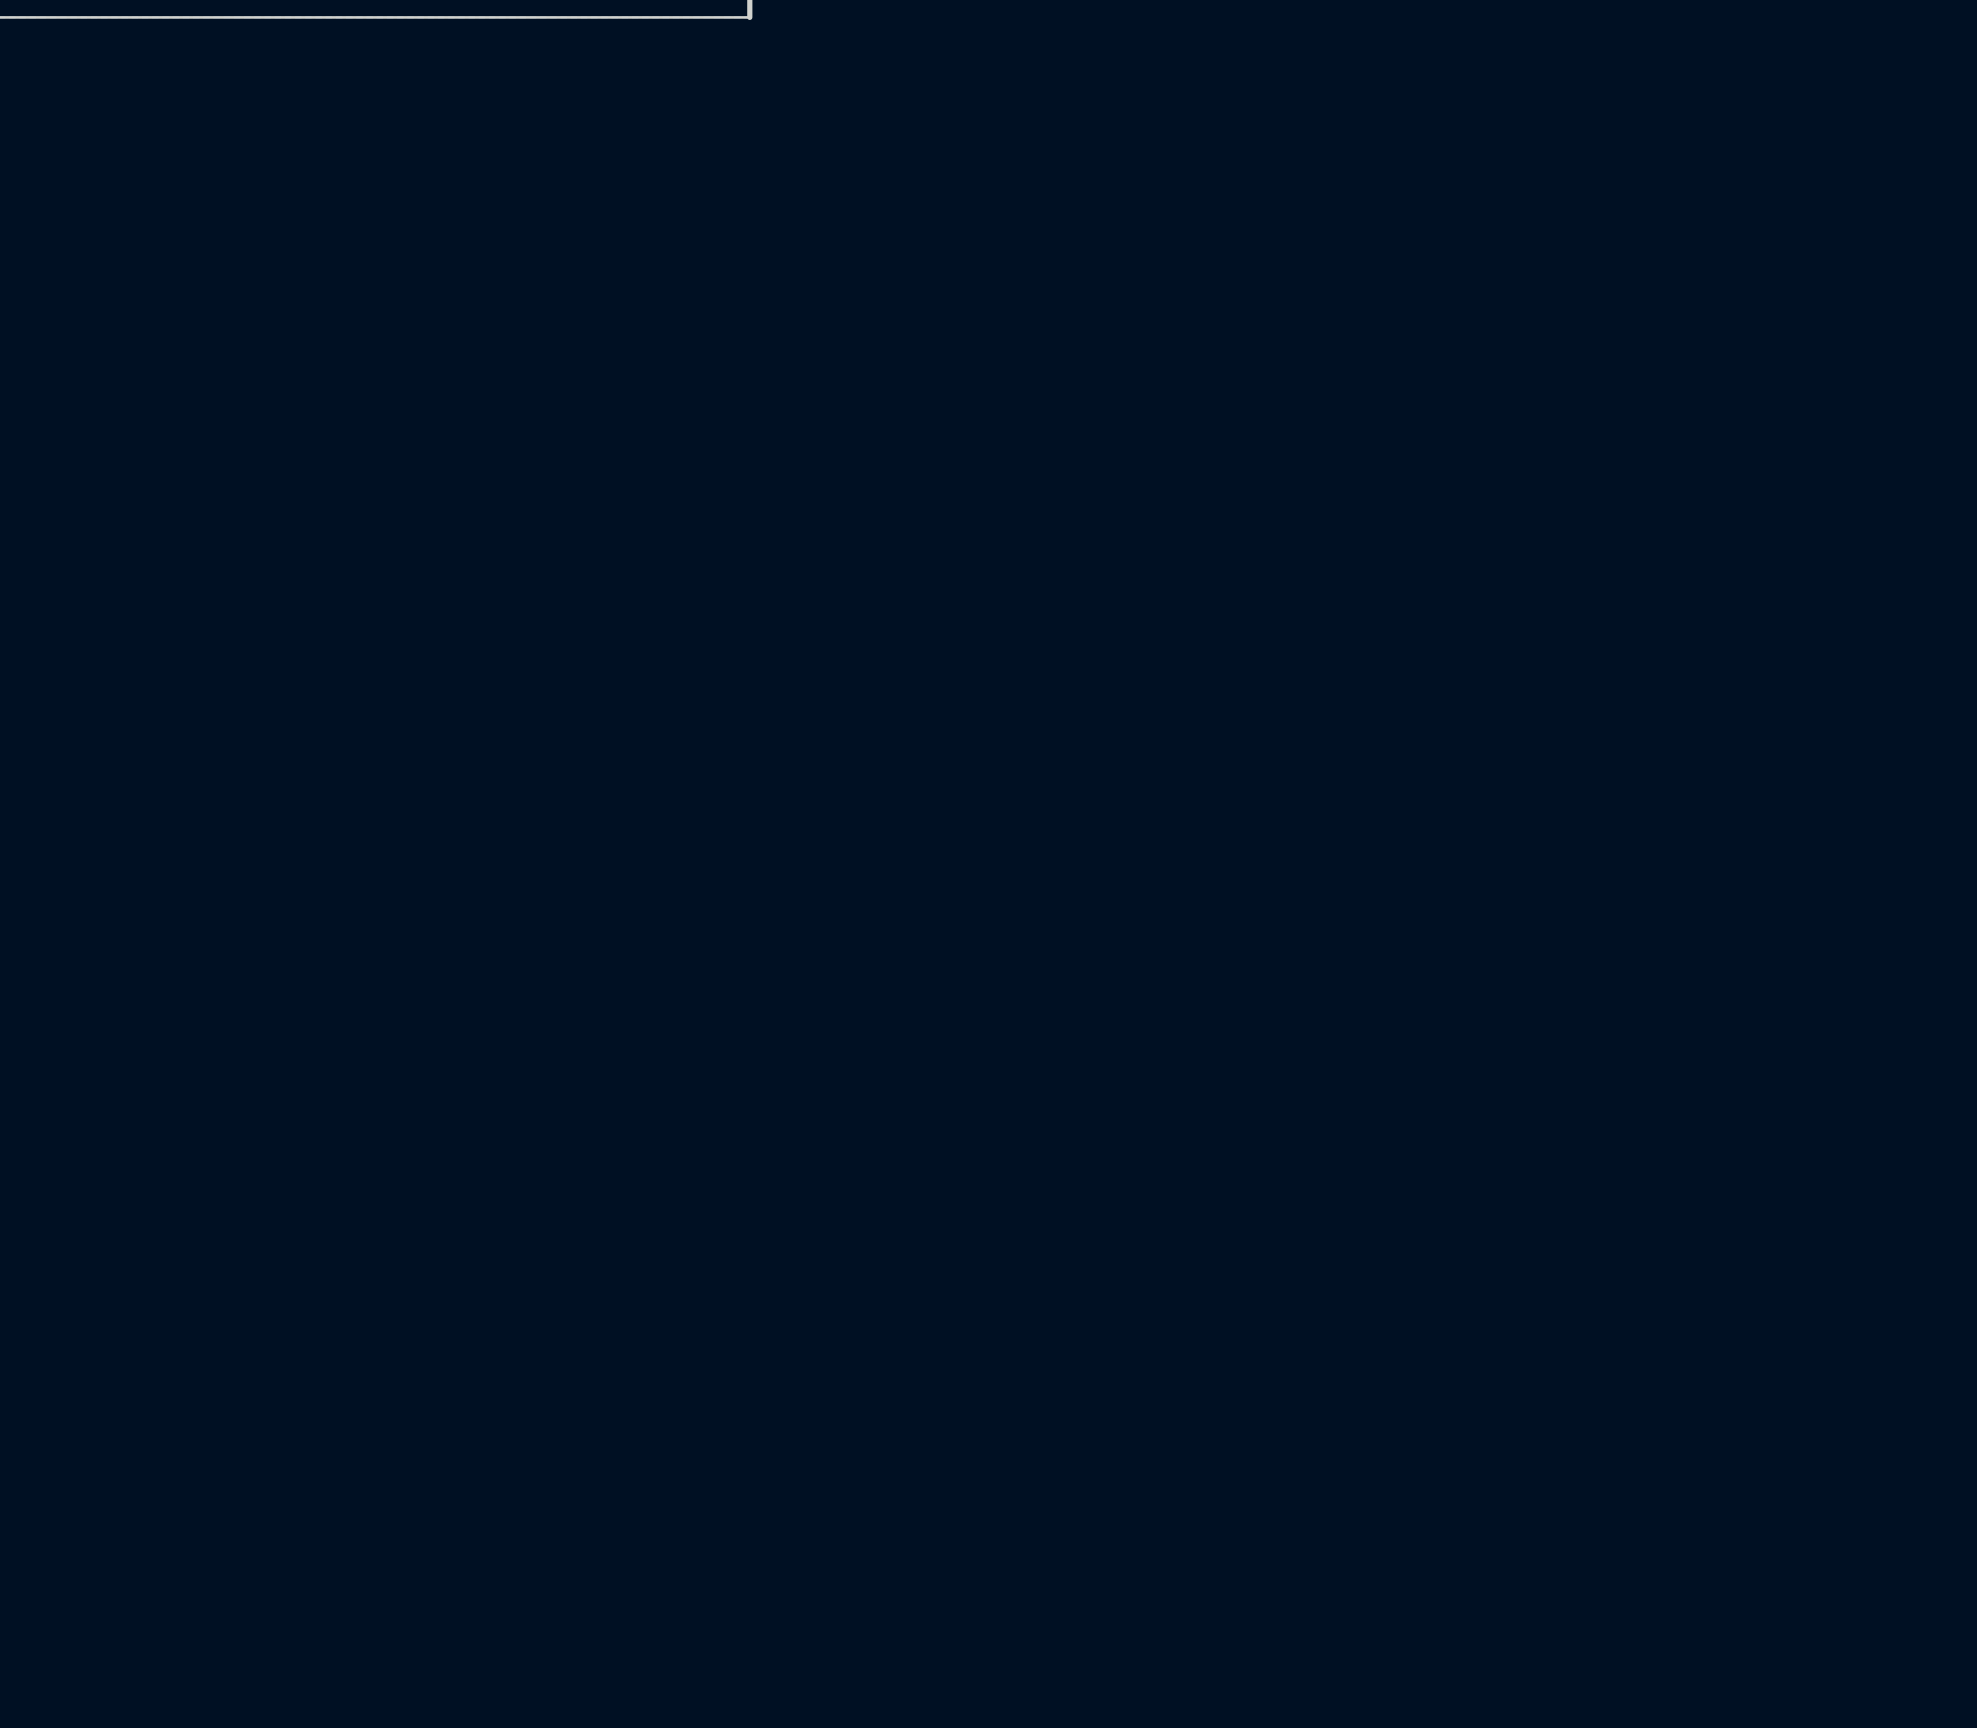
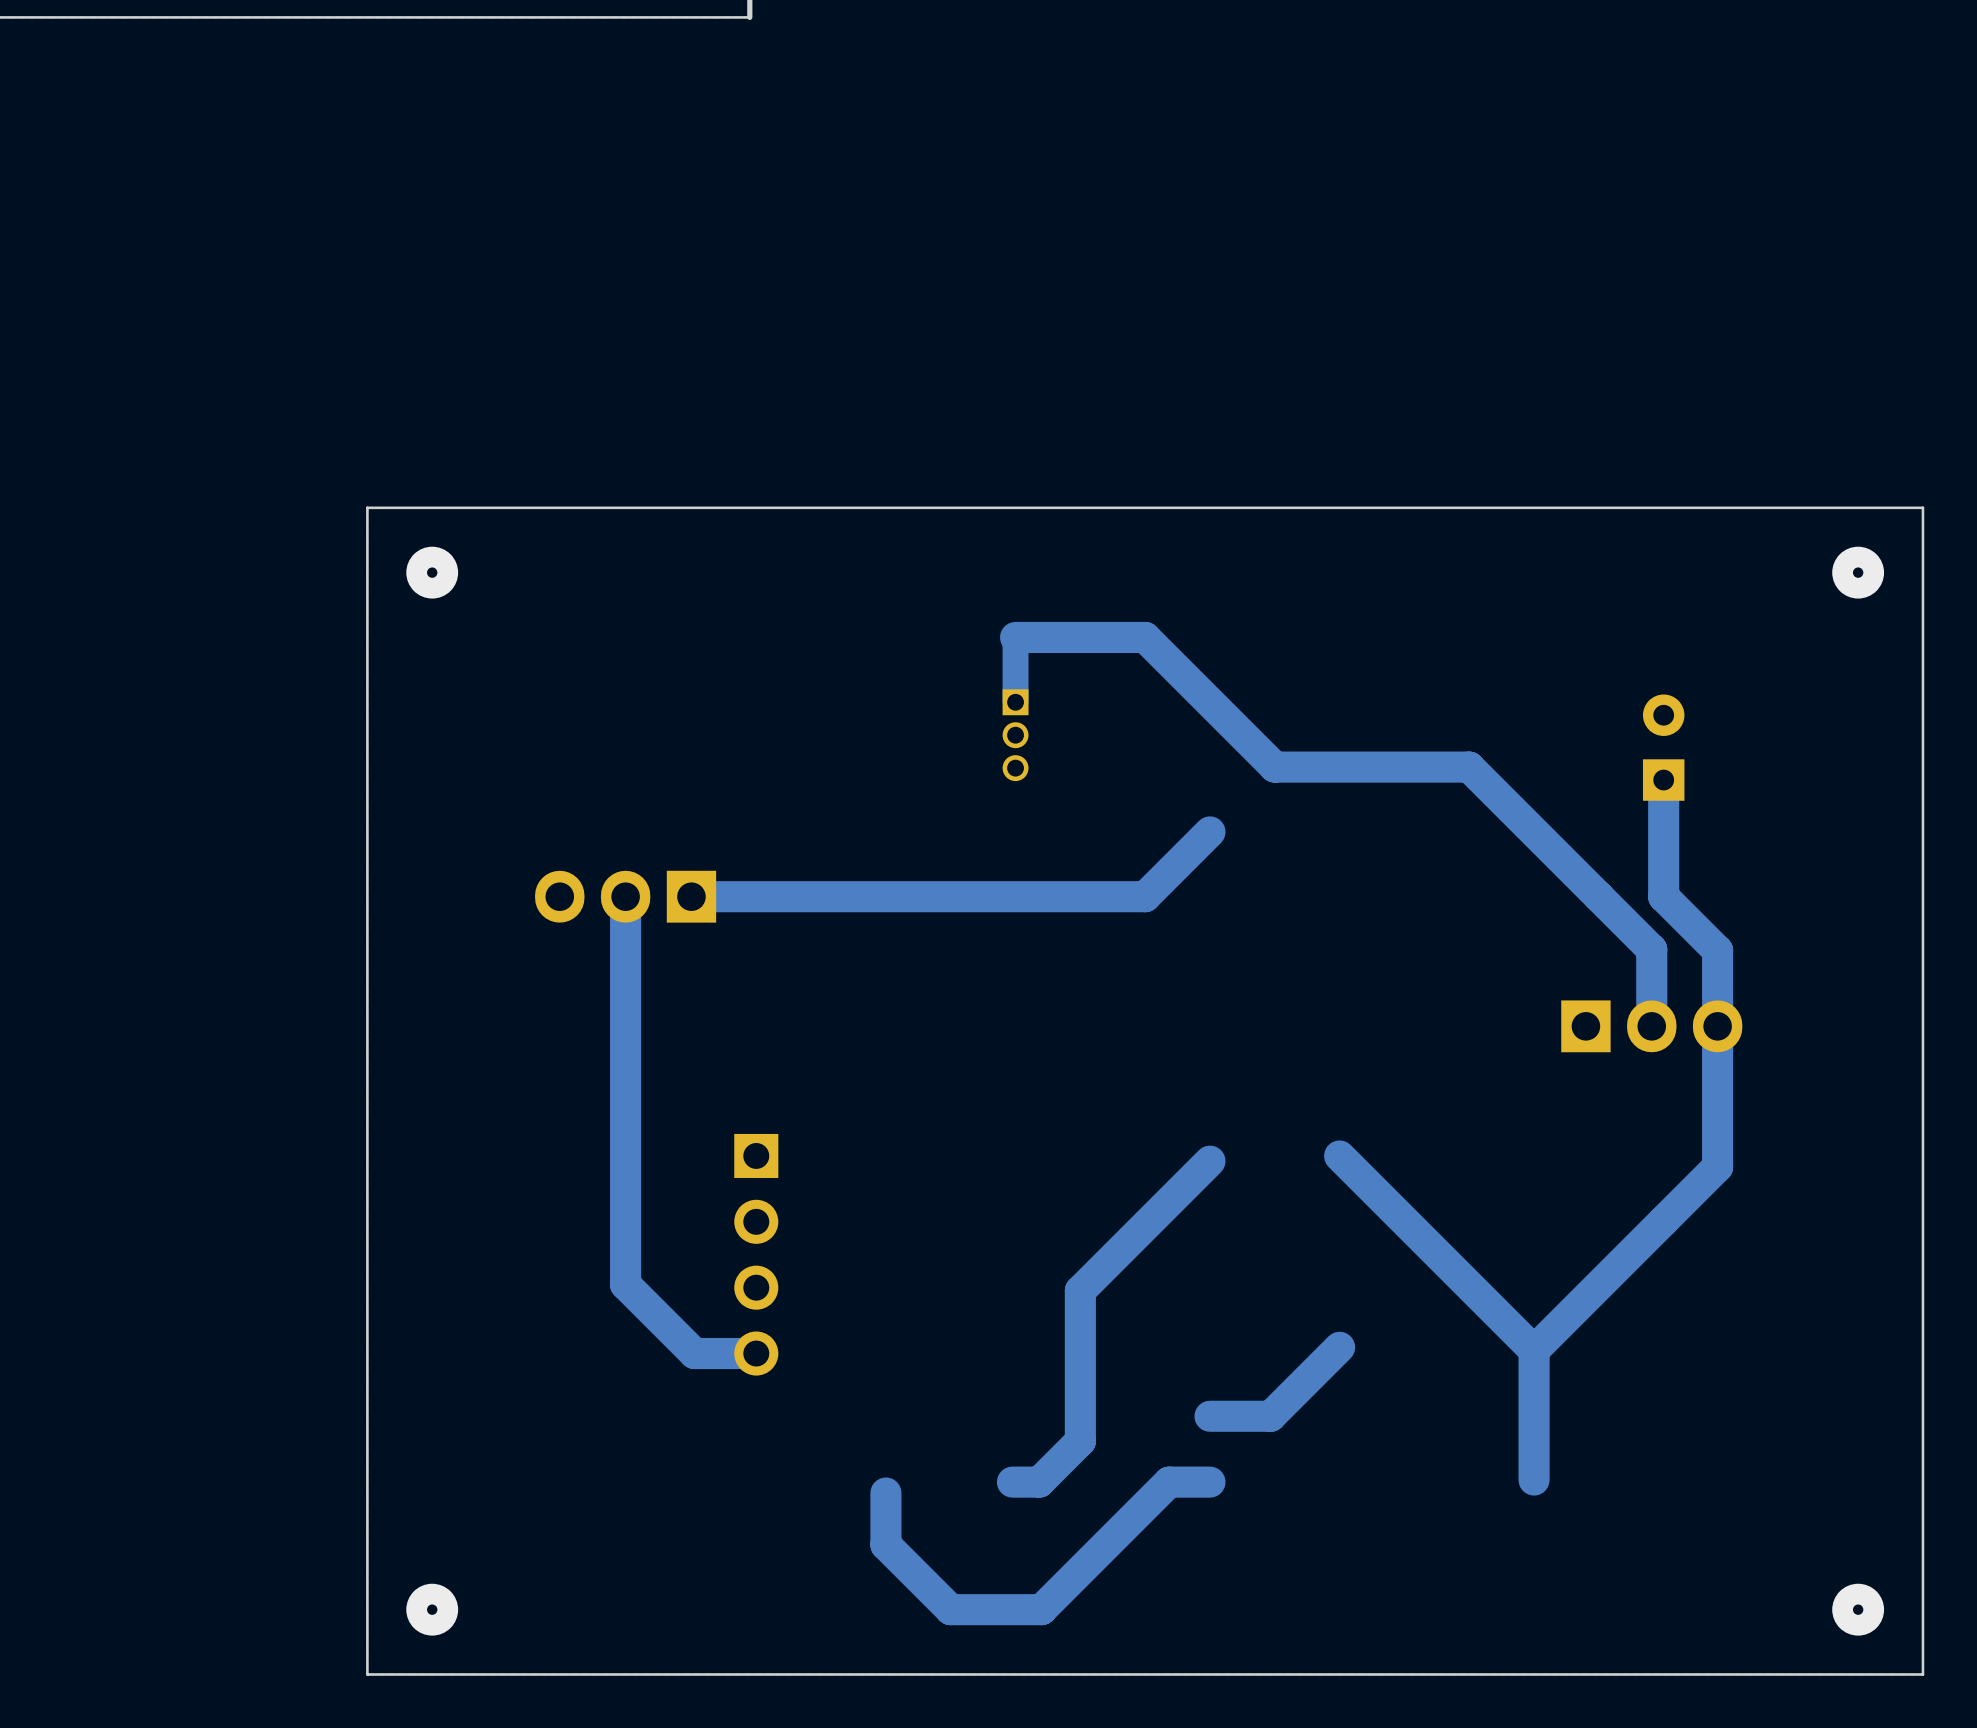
board edge: none -> (1922, 507) (1922, 1674) (367, 1674) (367, 507) (1922, 507)
via: none -> (432, 572)
via: none -> (1858, 572)
track: none -> (1015, 701) (1015, 637) (1145, 637) (1274, 767) (1469, 767) (1651, 949) (1651, 1026)
part: none -> (1015, 735)
part: none -> (1663, 747)
track: none -> (1663, 780) (1663, 896)
track: none -> (1209, 831) (1145, 896) (691, 896)
track: none -> (625, 896) (625, 1284) (694, 1353) (756, 1353)
part: none -> (625, 896)
track: none -> (1663, 896) (1717, 950) (1717, 1166) (1534, 1350)
part: none -> (1651, 1026)
track: none -> (1339, 1155) (1534, 1350)
track: none -> (1209, 1161) (1080, 1290) (1080, 1441) (1039, 1482) (1012, 1482)
part: none -> (756, 1254)
track: none -> (1339, 1347) (1270, 1416) (1209, 1416)
track: none -> (1534, 1350) (1534, 1480)
track: none -> (1209, 1482) (1169, 1482) (1041, 1609) (950, 1609) (885, 1544) (885, 1493)
via: none -> (432, 1609)
via: none -> (1858, 1609)

